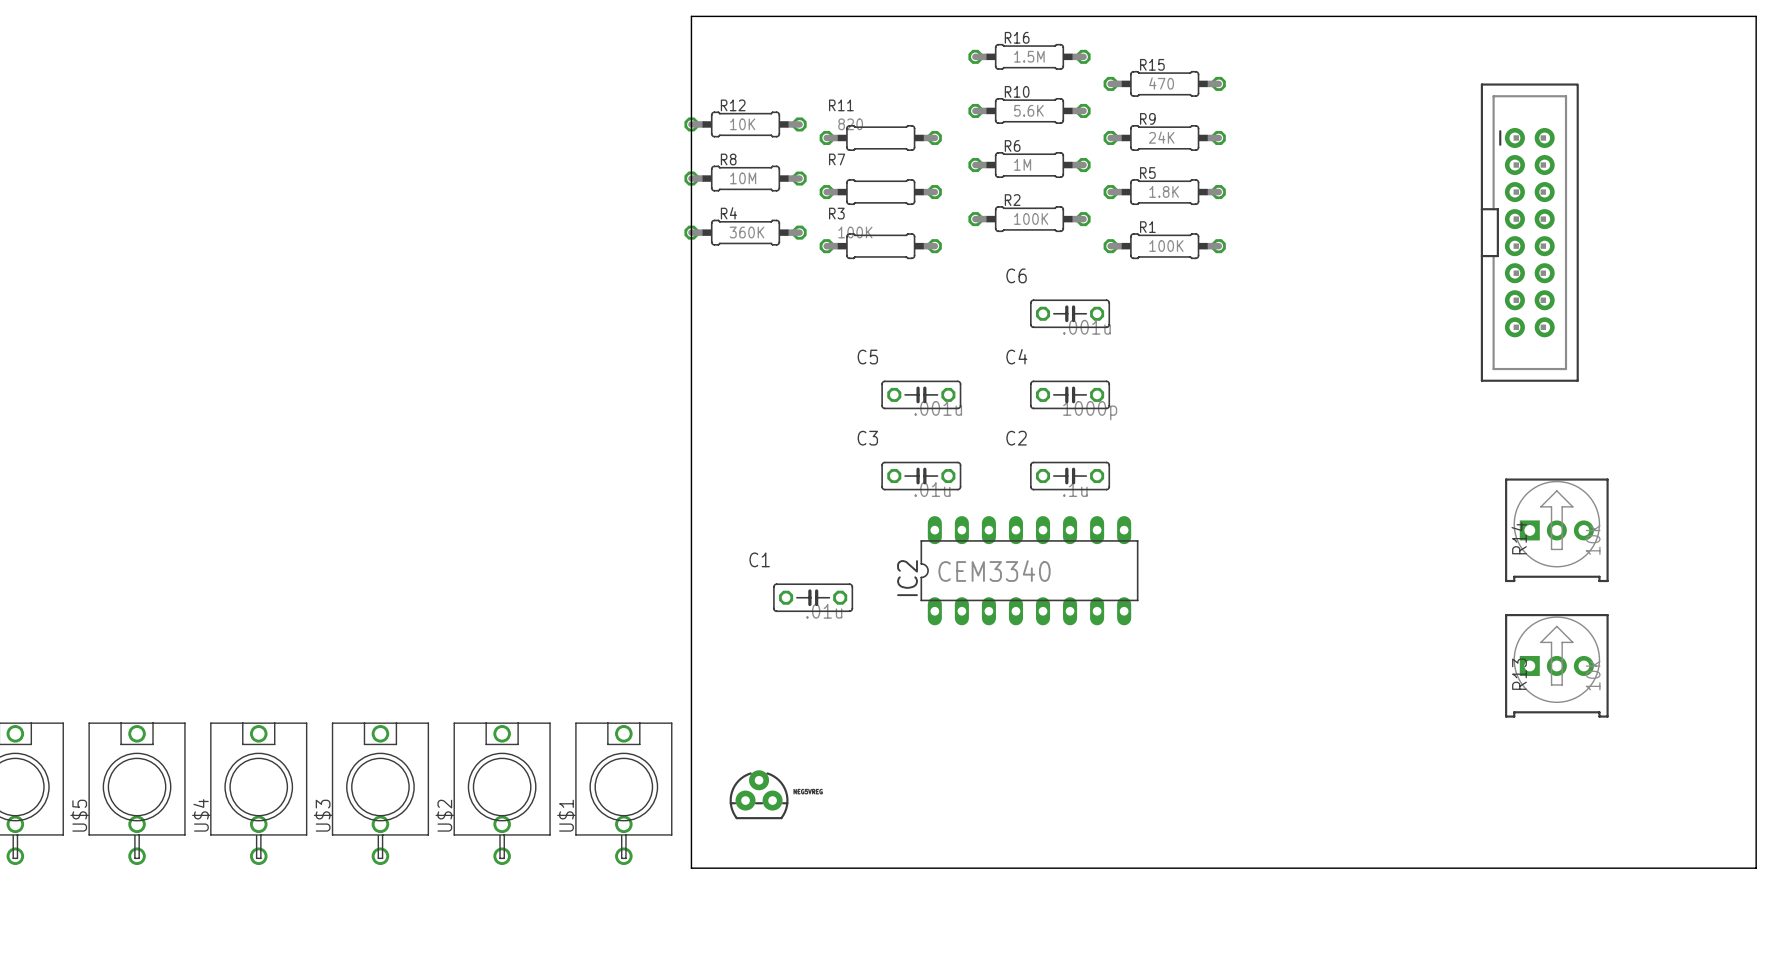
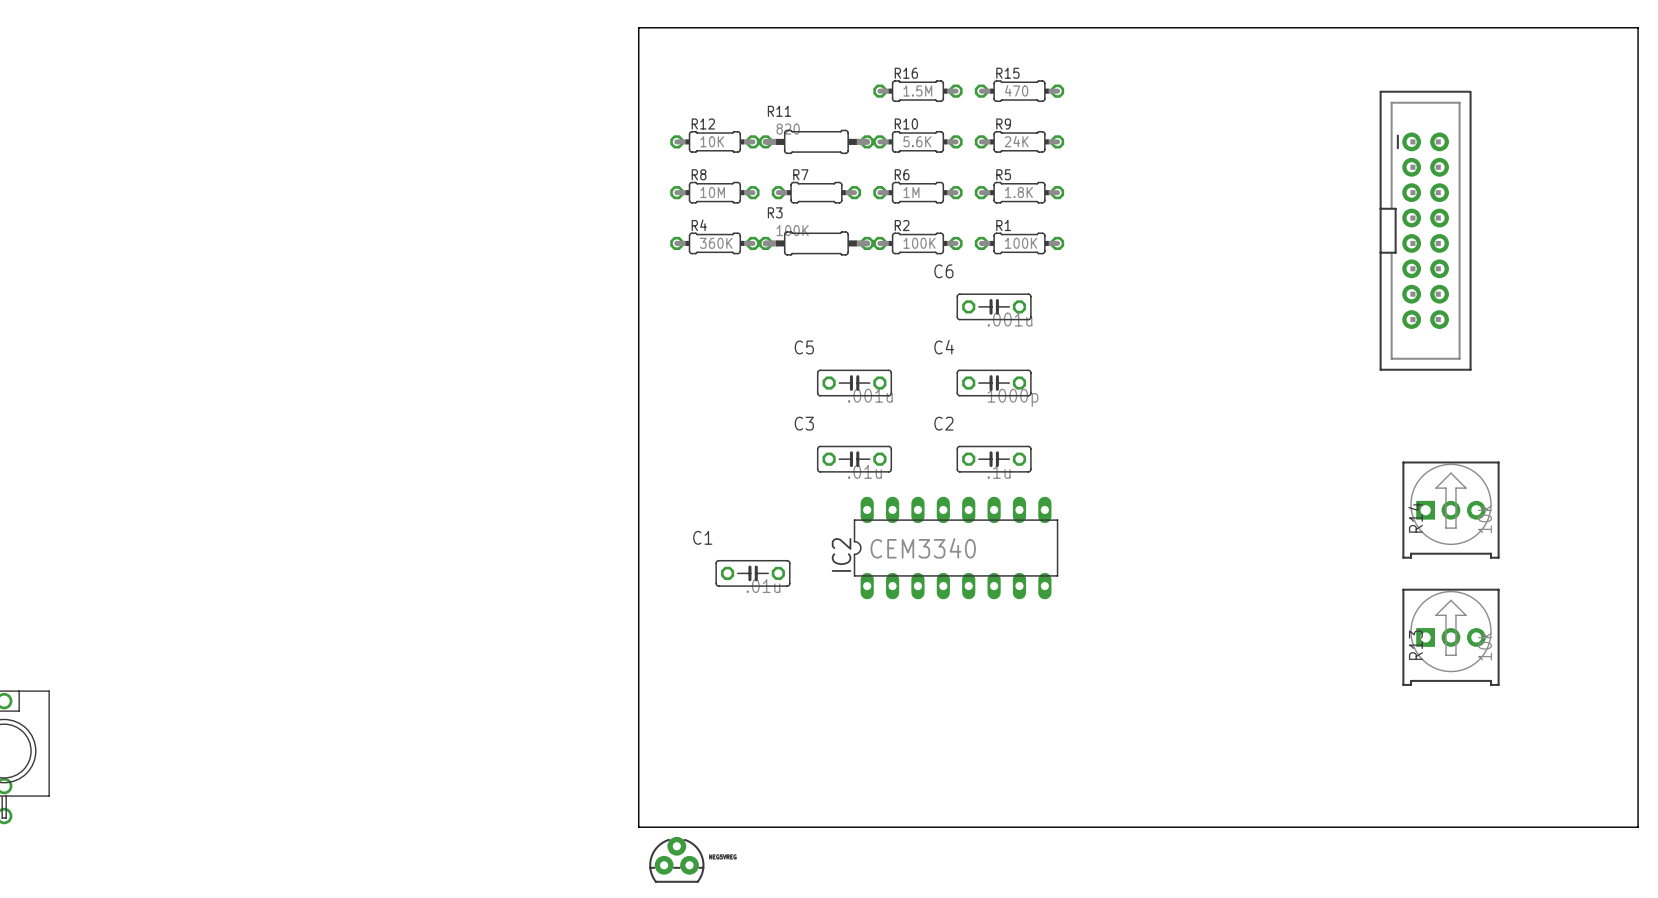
R16 footprint: [968, 43, 1091, 70] -> [873, 80, 963, 103]
R15 footprint: [1103, 70, 1226, 97] -> [974, 80, 1065, 103]
R10 footprint: [968, 97, 1091, 124] -> [873, 130, 963, 153]
R12 footprint: [684, 111, 807, 138] -> [670, 130, 760, 153]
R9 footprint: [1103, 125, 1226, 151] -> [974, 130, 1065, 153]
R6 footprint: [968, 152, 1091, 179] -> [873, 181, 963, 204]
R7 name position: R7 (837, 159) -> R7 (800, 174)
R8 footprint: [684, 165, 807, 192] -> [670, 181, 760, 204]
R7 footprint: [819, 179, 942, 206] -> [771, 181, 862, 204]
R5 footprint: [1103, 179, 1226, 206] -> [974, 181, 1065, 204]
R2 footprint: [968, 206, 1091, 233] -> [873, 232, 963, 255]
R4 footprint: [684, 219, 807, 246] -> [670, 232, 760, 255]
R1 footprint: [1103, 233, 1226, 260] -> [974, 232, 1065, 255]
U$5: (137, 793) -> none
U$4: (258, 793) -> none
U$3: (380, 793) -> none
U$2: (502, 793) -> none
U$1: (623, 793) -> none
part position: (759, 794) -> (676, 859)

